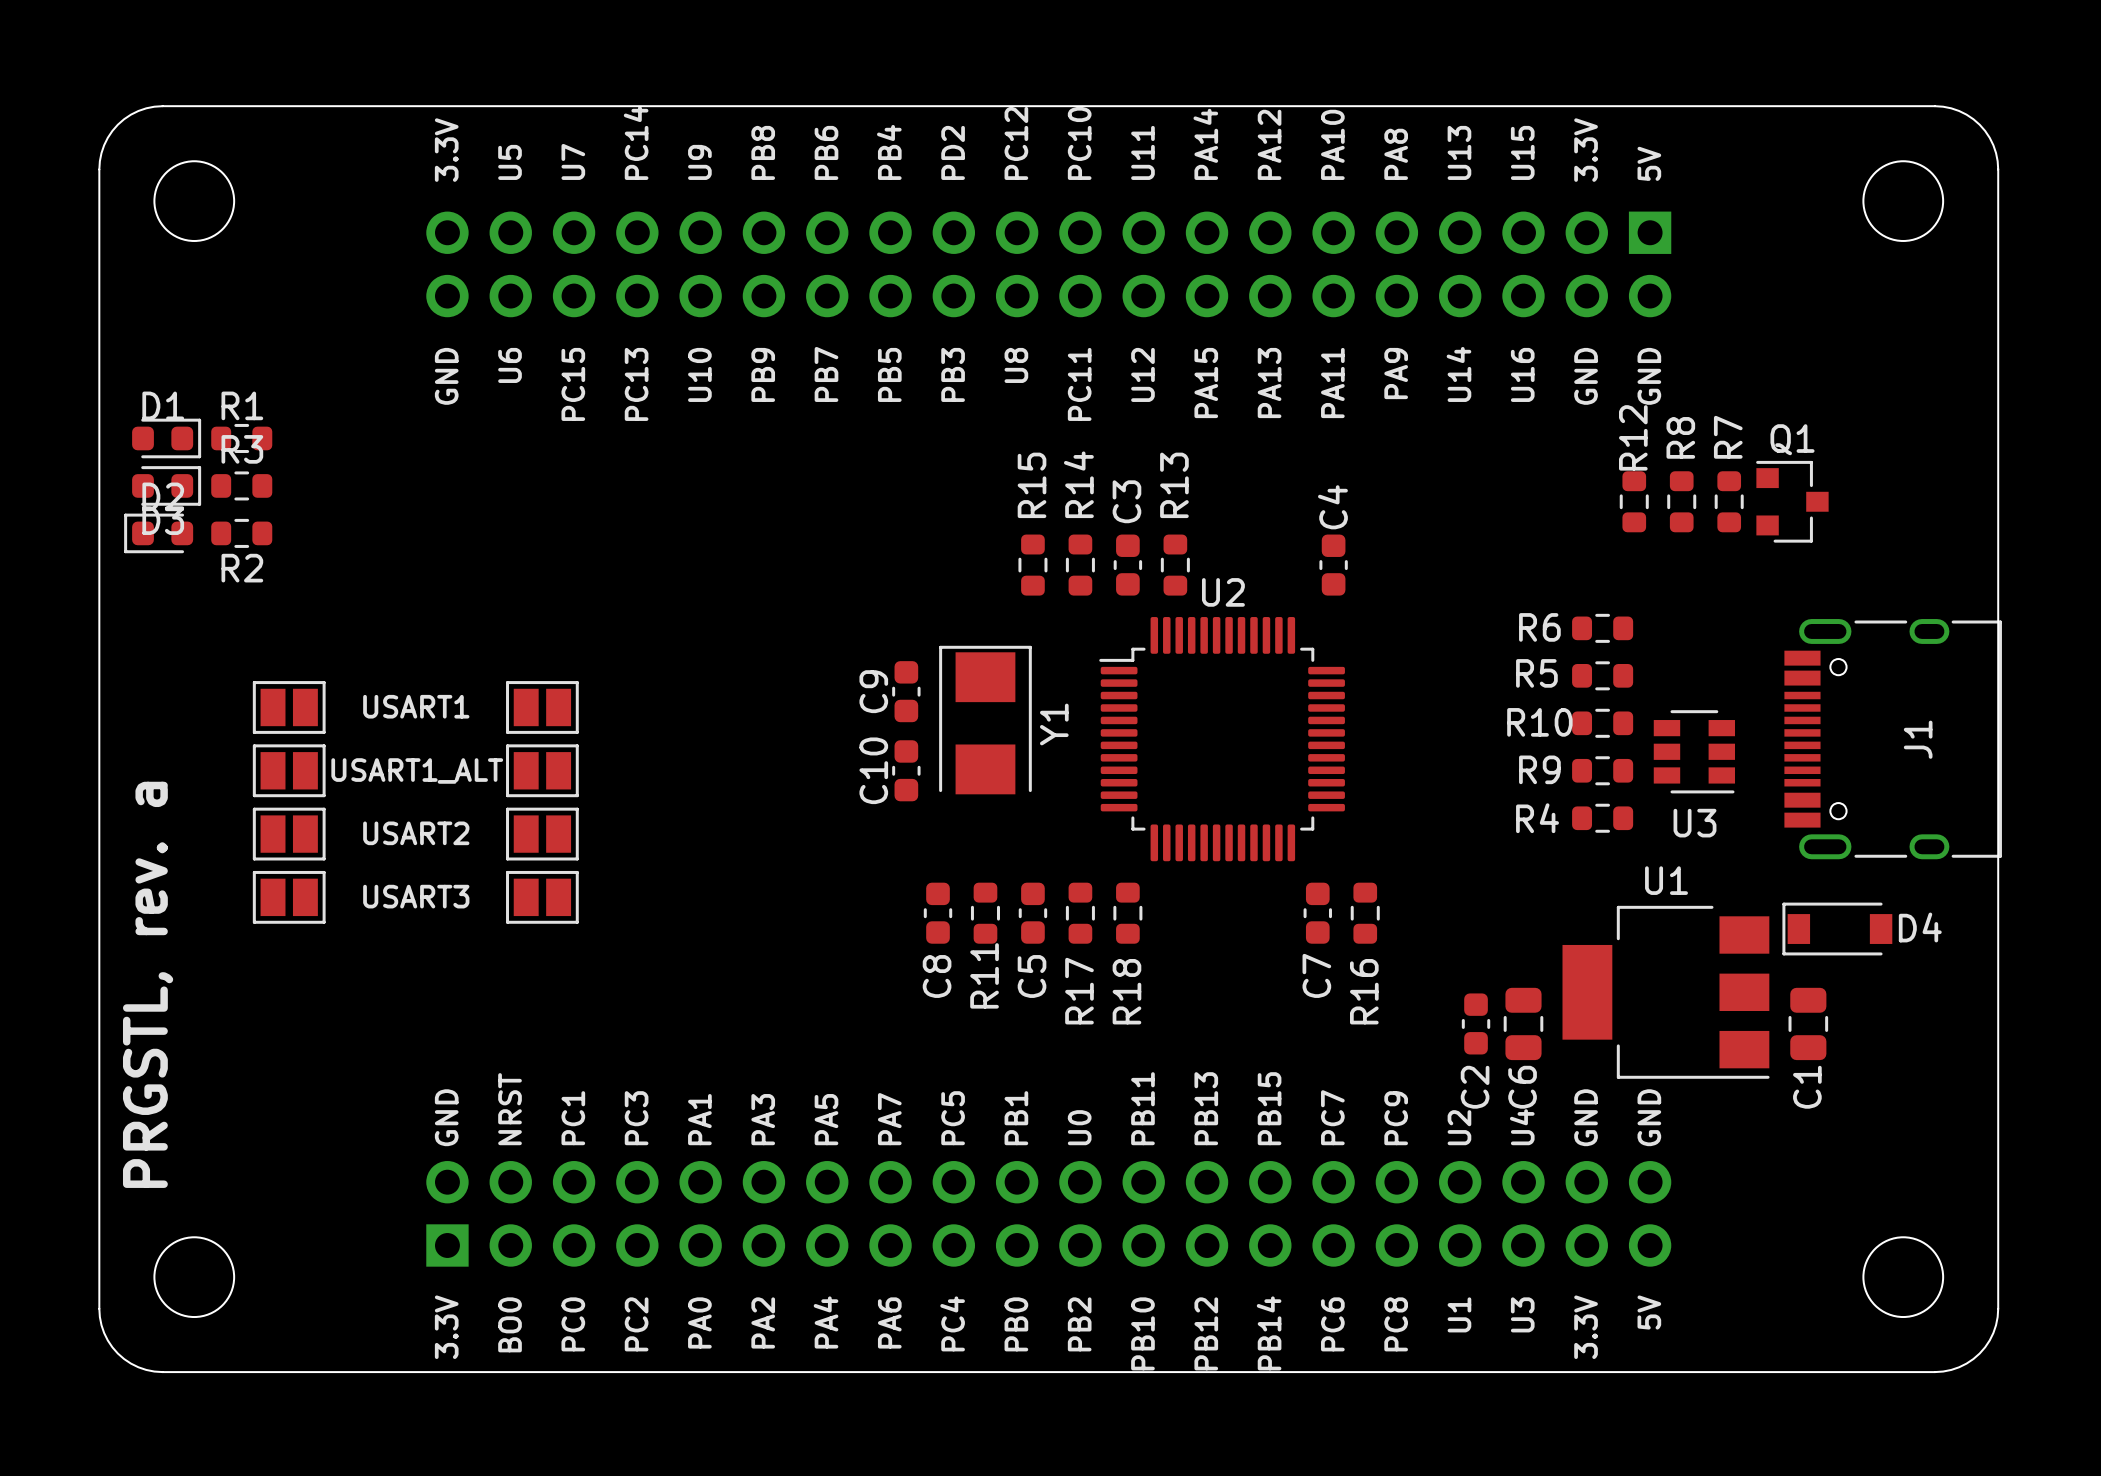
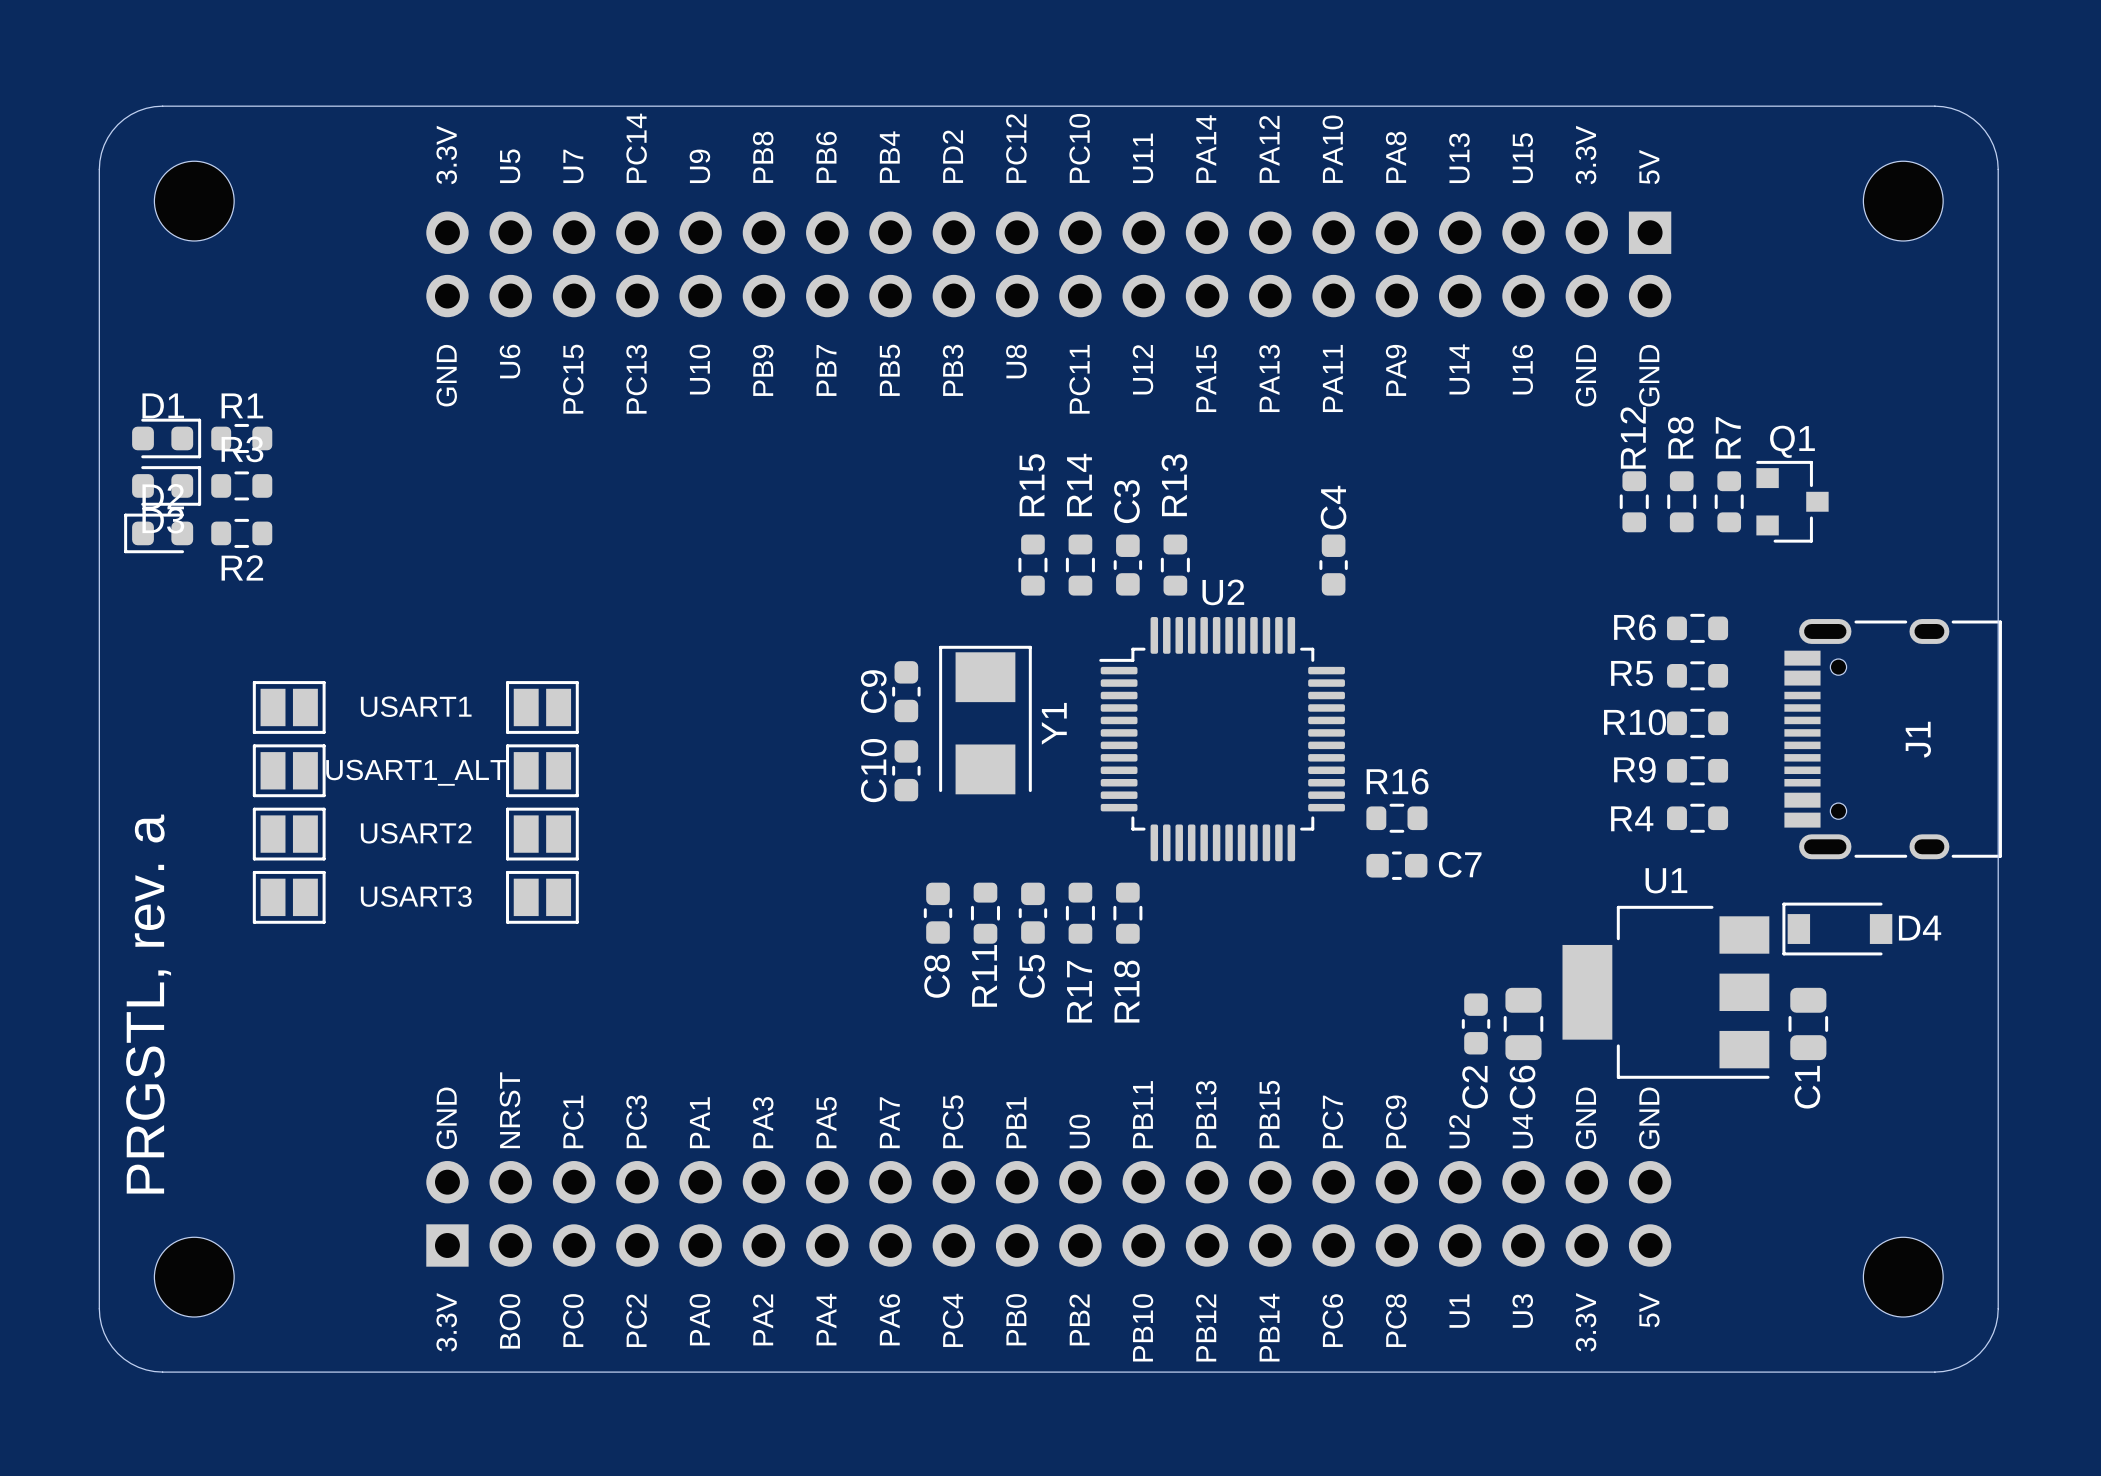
R6 position: (1602, 628) -> (1697, 628)
R5 position: (1602, 675) -> (1697, 675)
R10 position: (1602, 723) -> (1697, 723)
U3: (1694, 751) -> none
R9 position: (1602, 770) -> (1697, 770)
R4 position: (1602, 818) -> (1697, 818)
C7 rotation: 0° (1317, 913) -> 90° clockwise (1396, 865)
C7 position: (1317, 913) -> (1396, 865)
R16 rotation: 0° (1365, 913) -> 90° clockwise (1396, 818)
R16 position: (1365, 913) -> (1396, 818)
C7 name position: C7 (1316, 975) -> C7 (1460, 864)
R16 name position: R16 (1364, 991) -> R16 (1397, 781)

